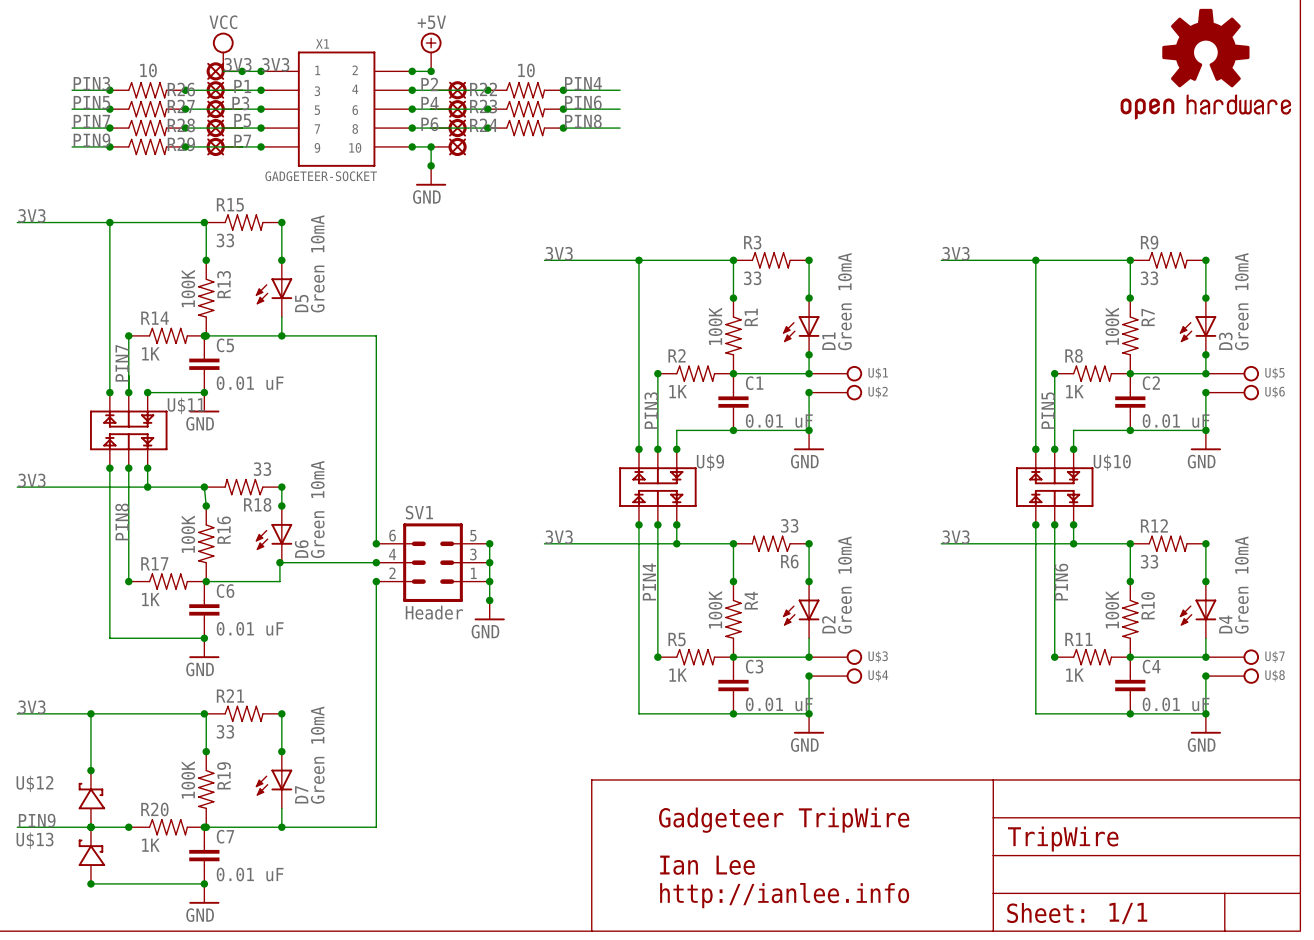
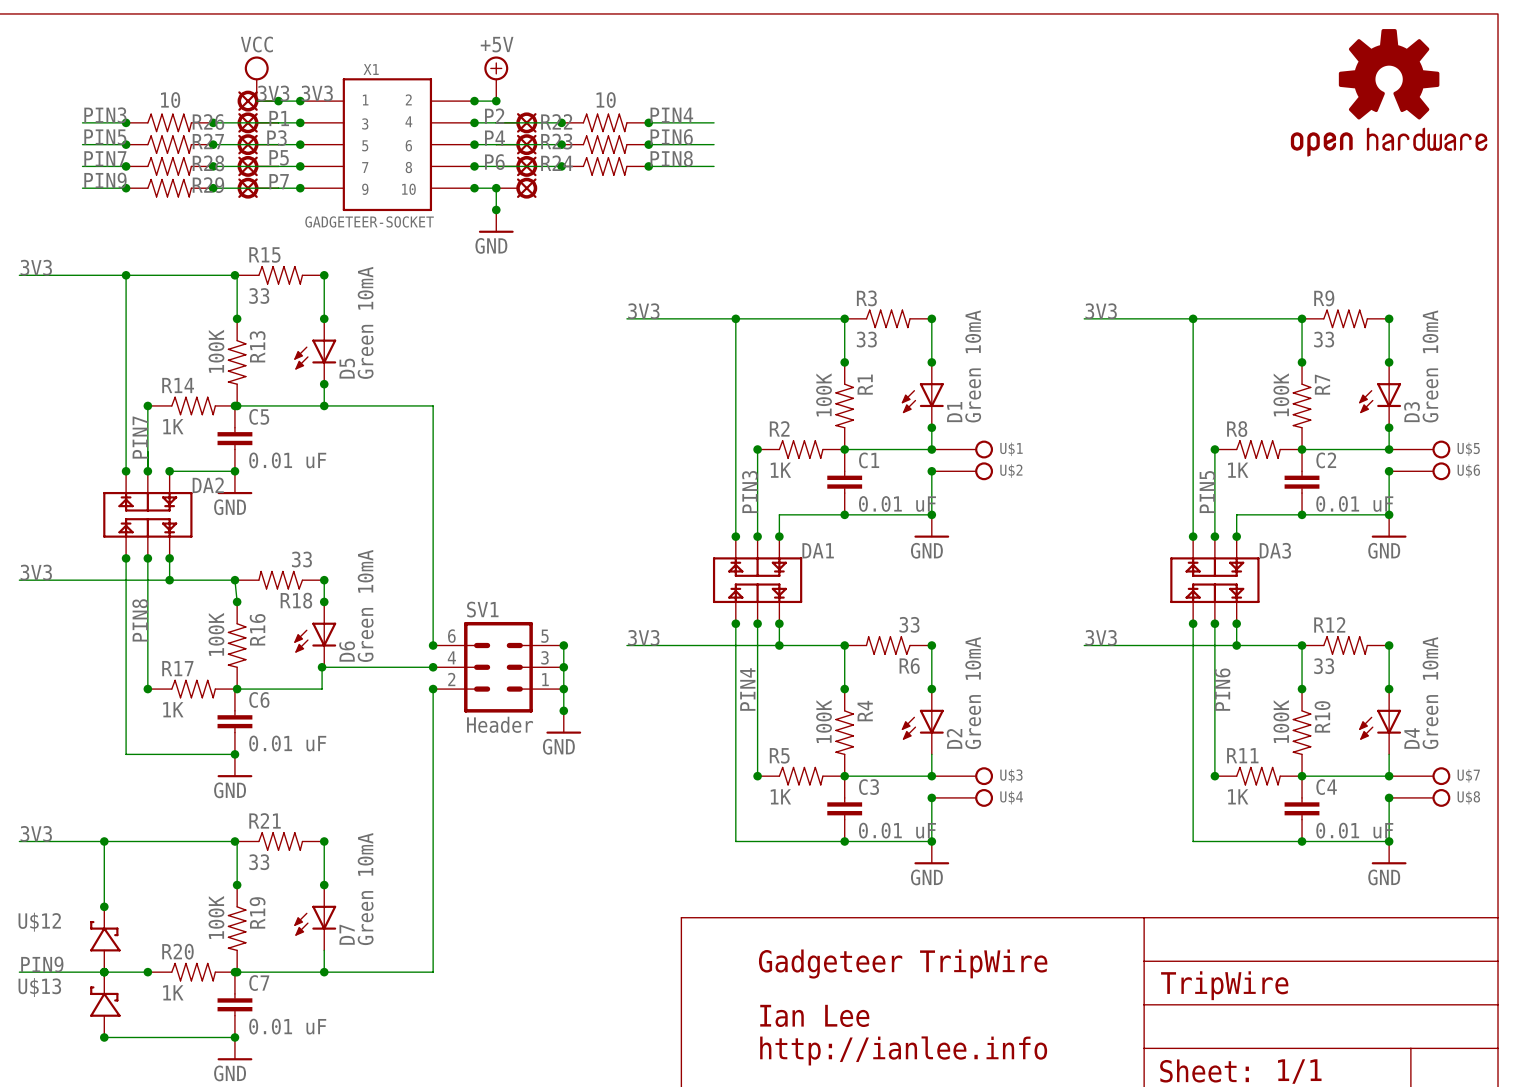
junction: none -> (324, 384)
U$11 name: U$11 (186, 405) -> DA2 (208, 485)
U$9 name: U$9 (710, 462) -> DA1 (818, 550)
U$10 name: U$10 (1112, 462) -> DA3 (1275, 550)

